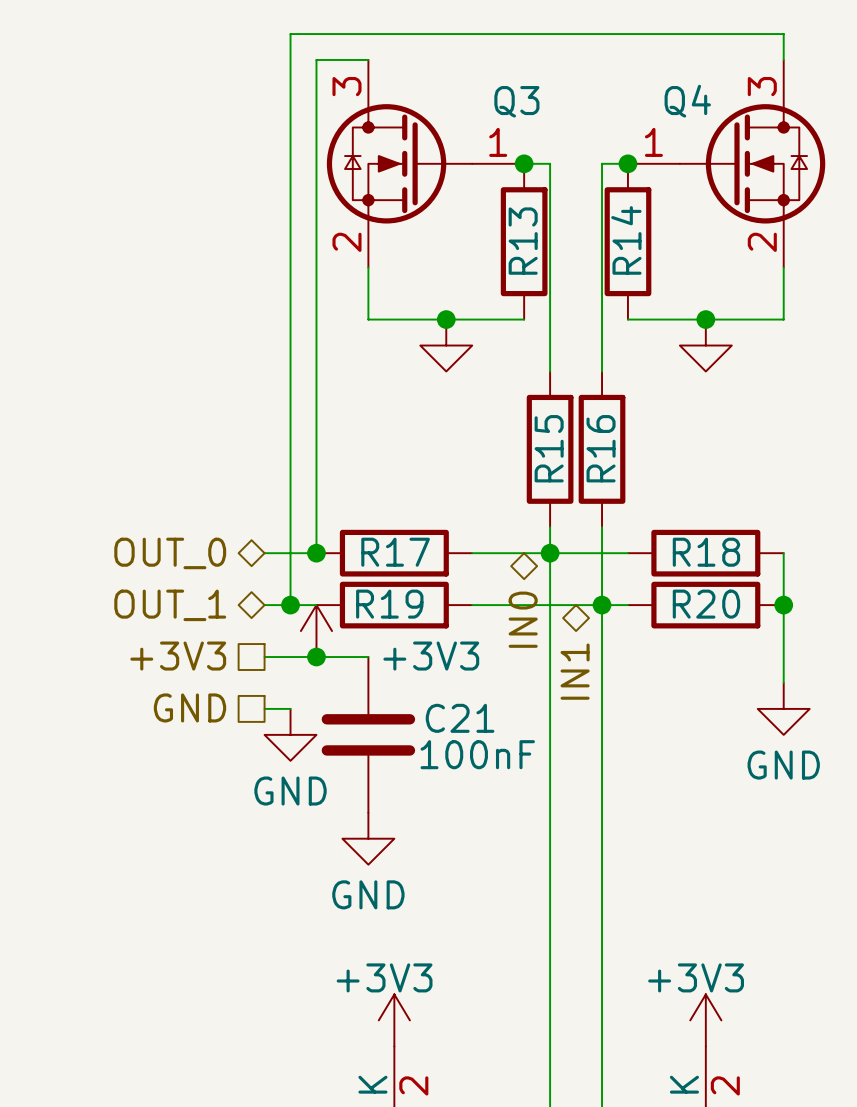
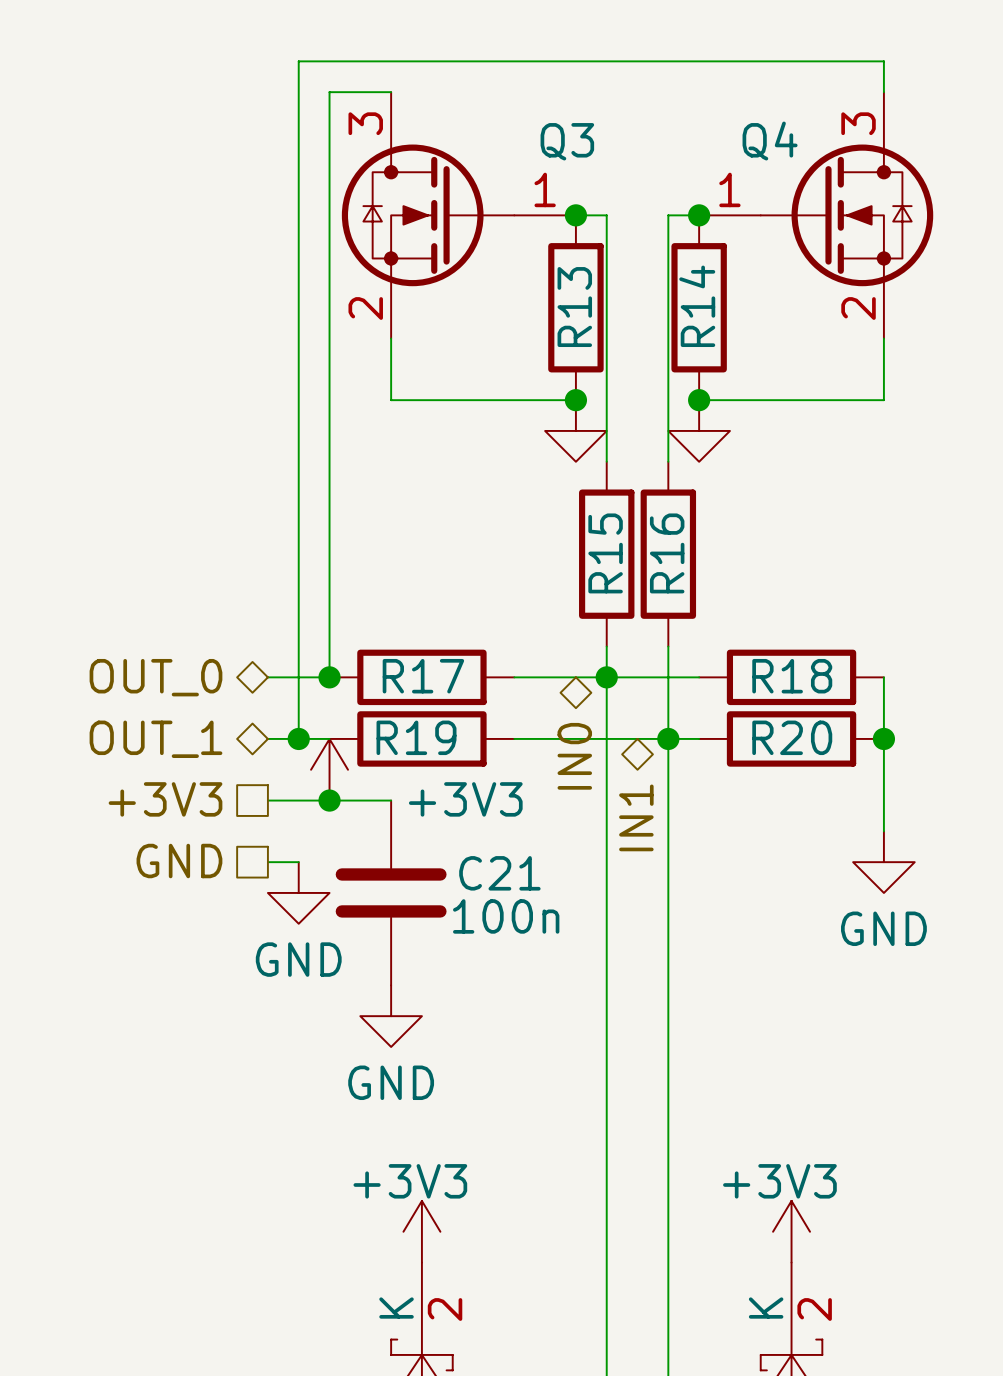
junction position: (446, 319) -> (575, 400)
junction position: (705, 319) -> (699, 400)
power symbol position: (446, 345) -> (575, 430)
power symbol position: (705, 345) -> (699, 430)
C21 value: 100nF (477, 754) -> 100n (506, 916)

